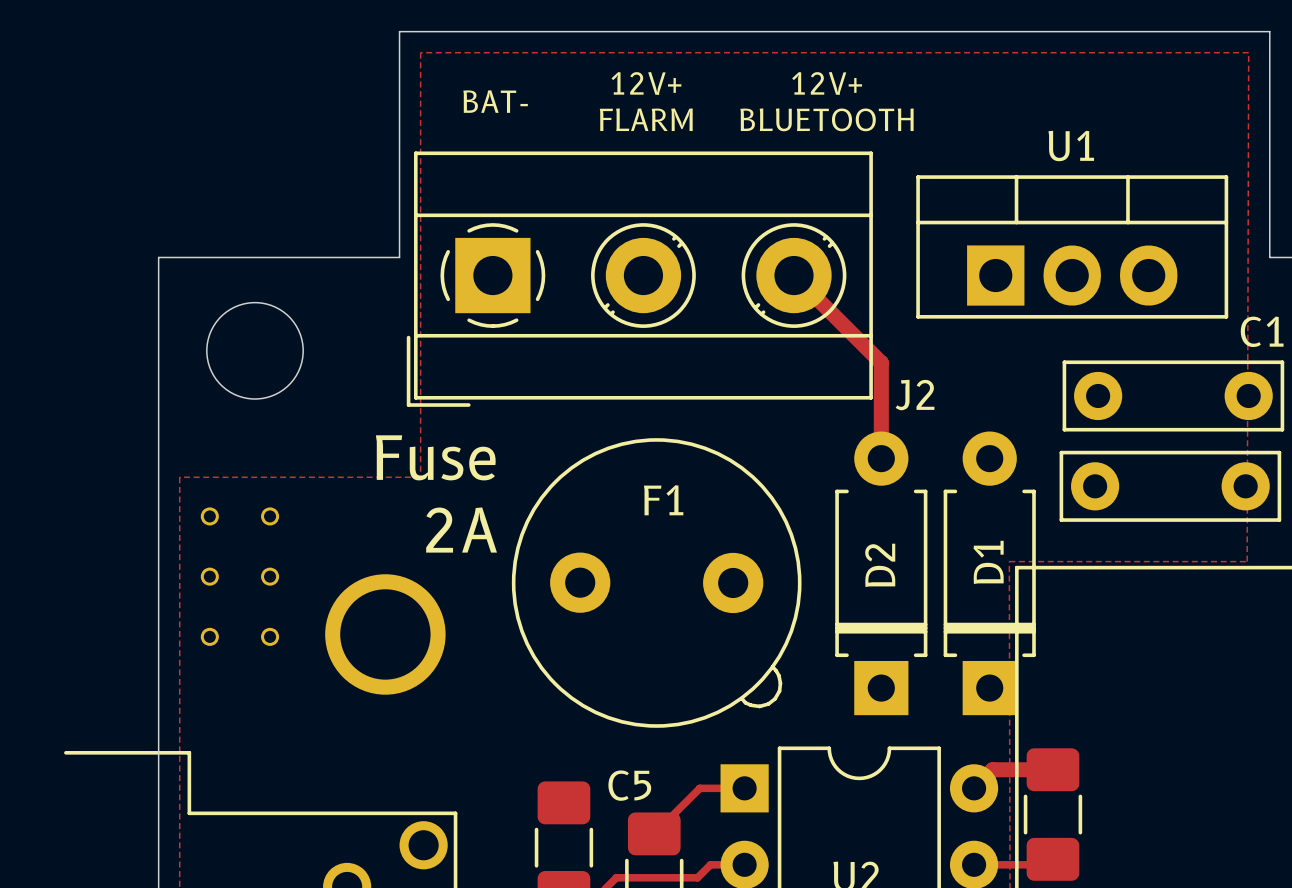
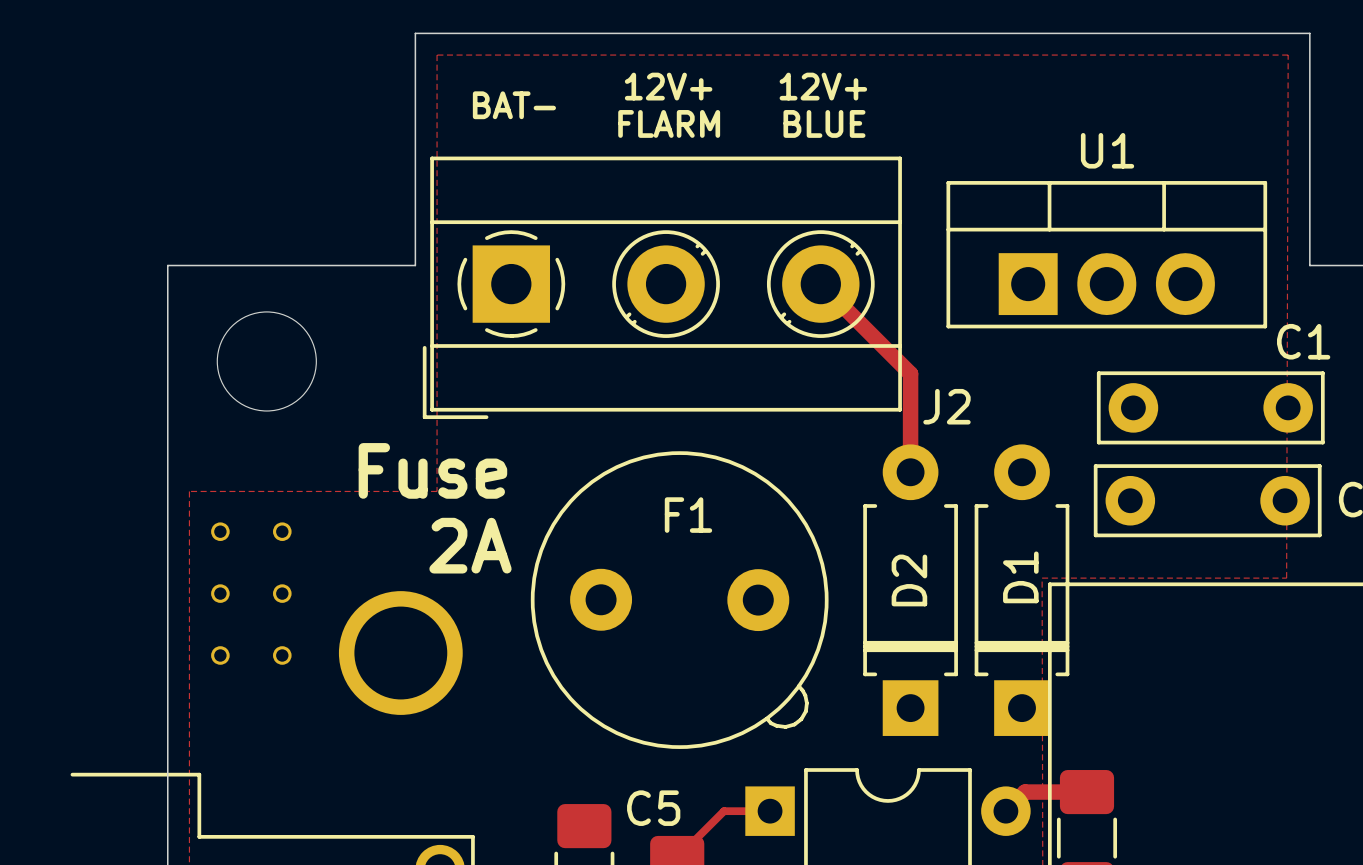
text position: 12V+ (827, 83) -> 12V+ (823, 86)
text: BLUETOOTH (826, 119) -> BLUE (824, 123)

